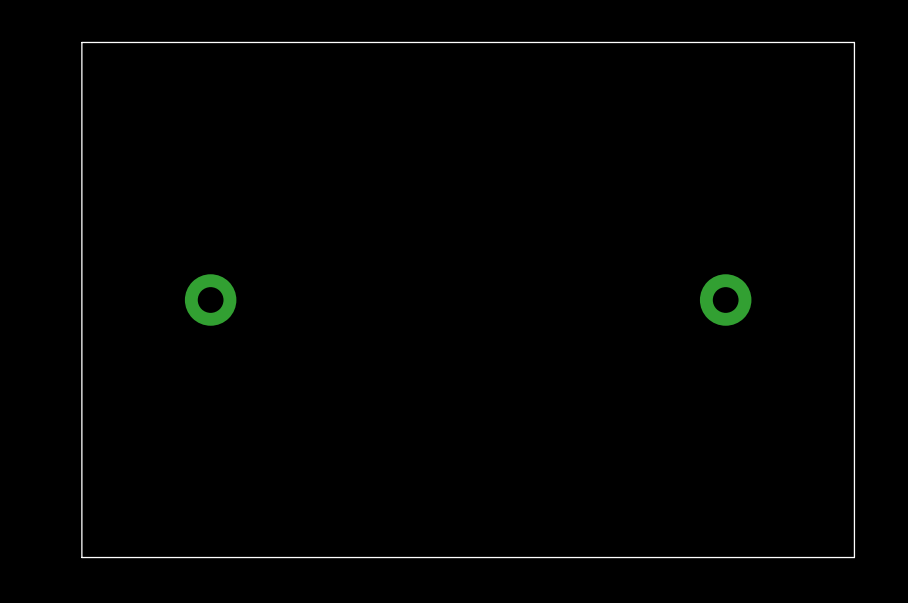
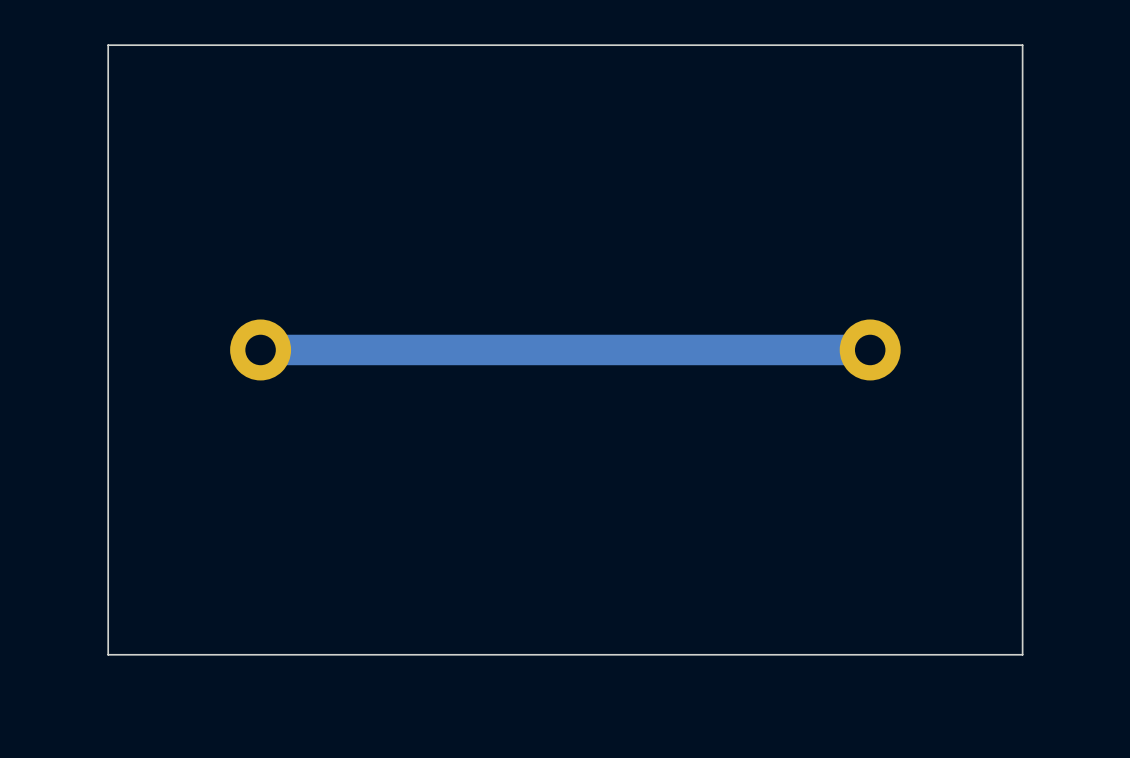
bottom track: none -> (870, 349) (260, 349)

